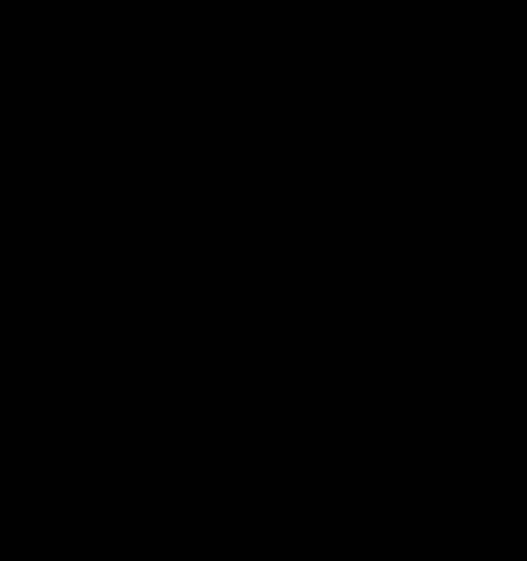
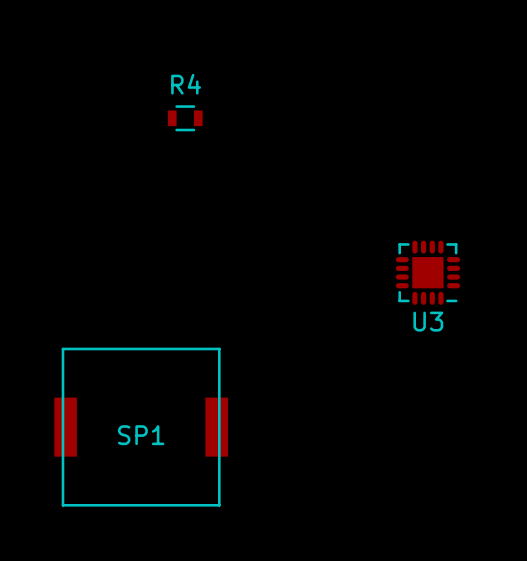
R4: none -> (185, 118)
U3: none -> (427, 272)
SP1: none -> (141, 427)

